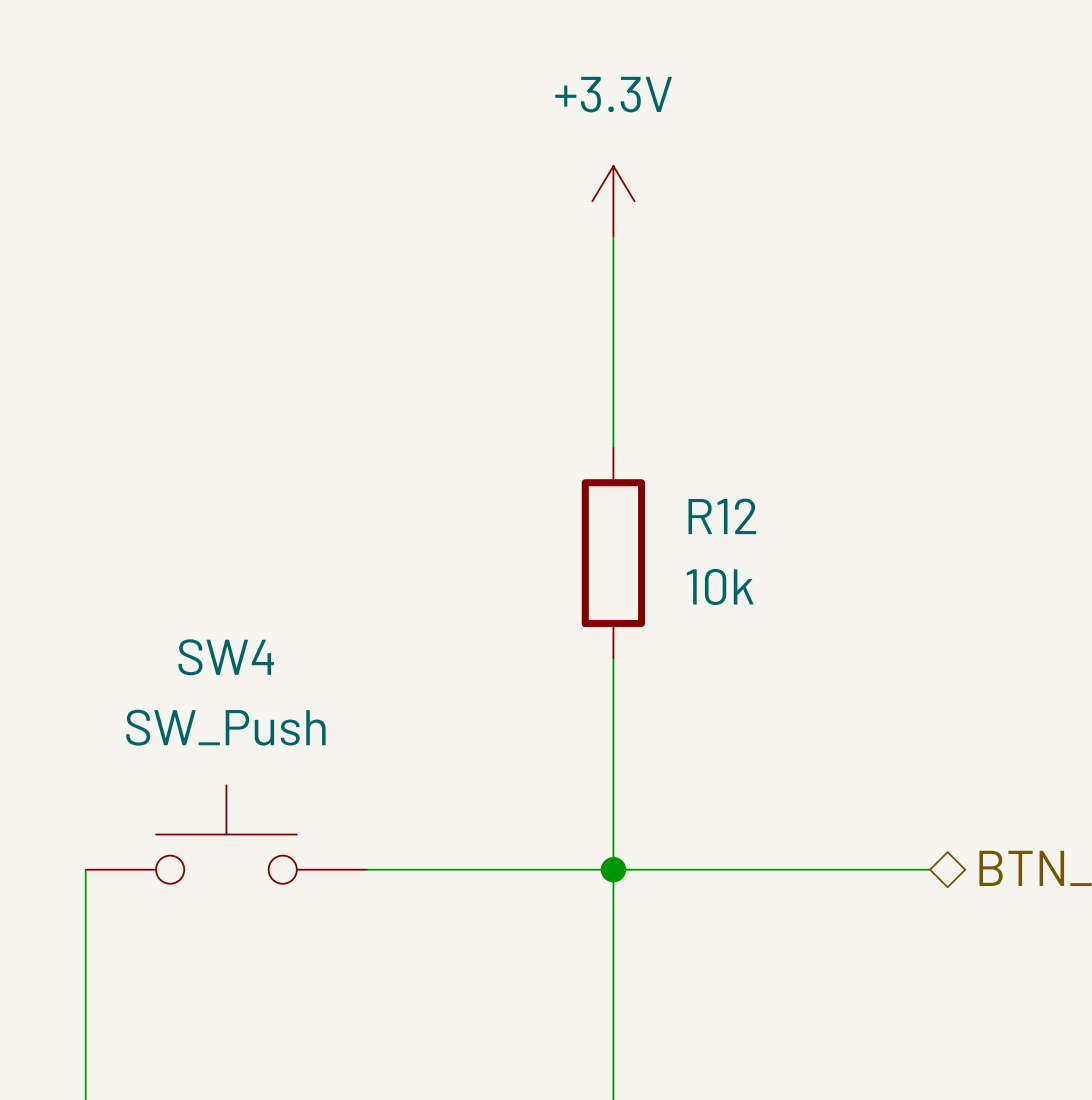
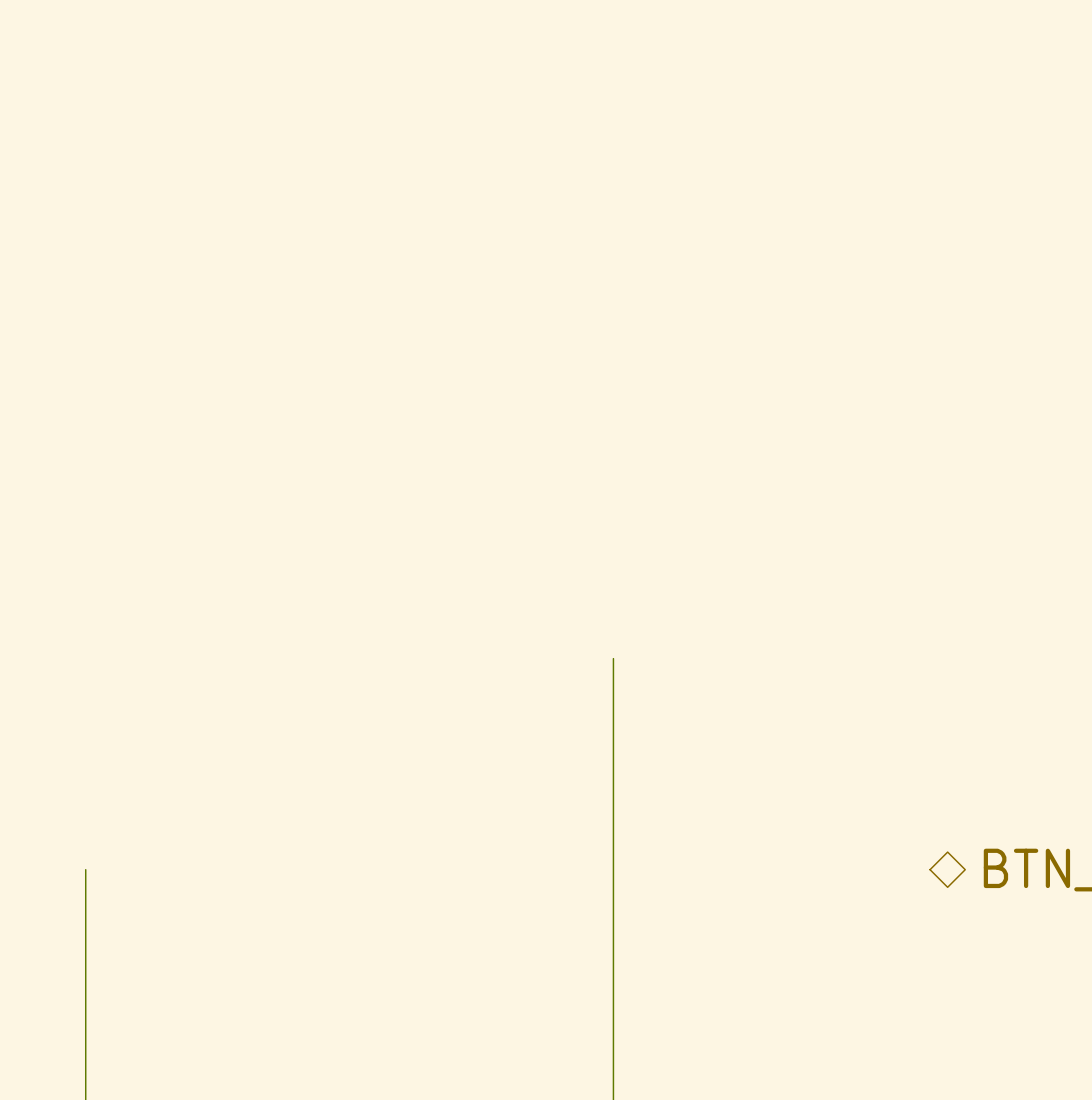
power symbol: +3.3V (613, 201) -> none
wire: (613, 236) (613, 447) -> none
R12: 10k (613, 553) -> none
SW4: SW_Push (226, 834) -> none
wire: (367, 869) (930, 869) -> none
junction: (613, 869) -> none

